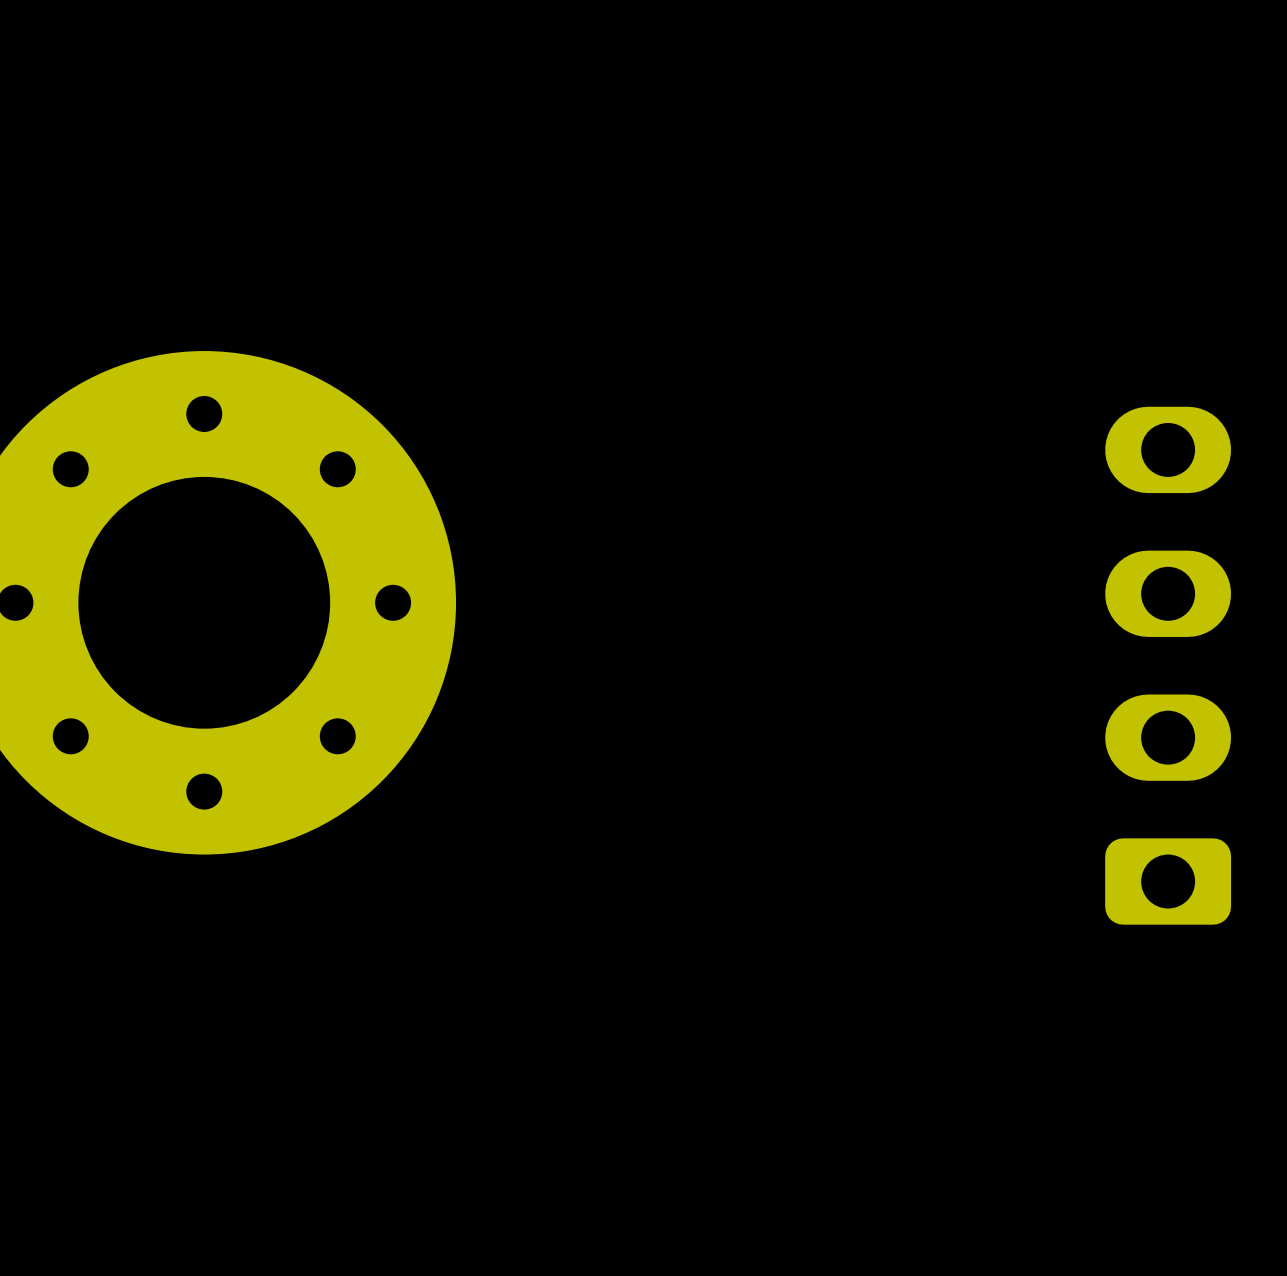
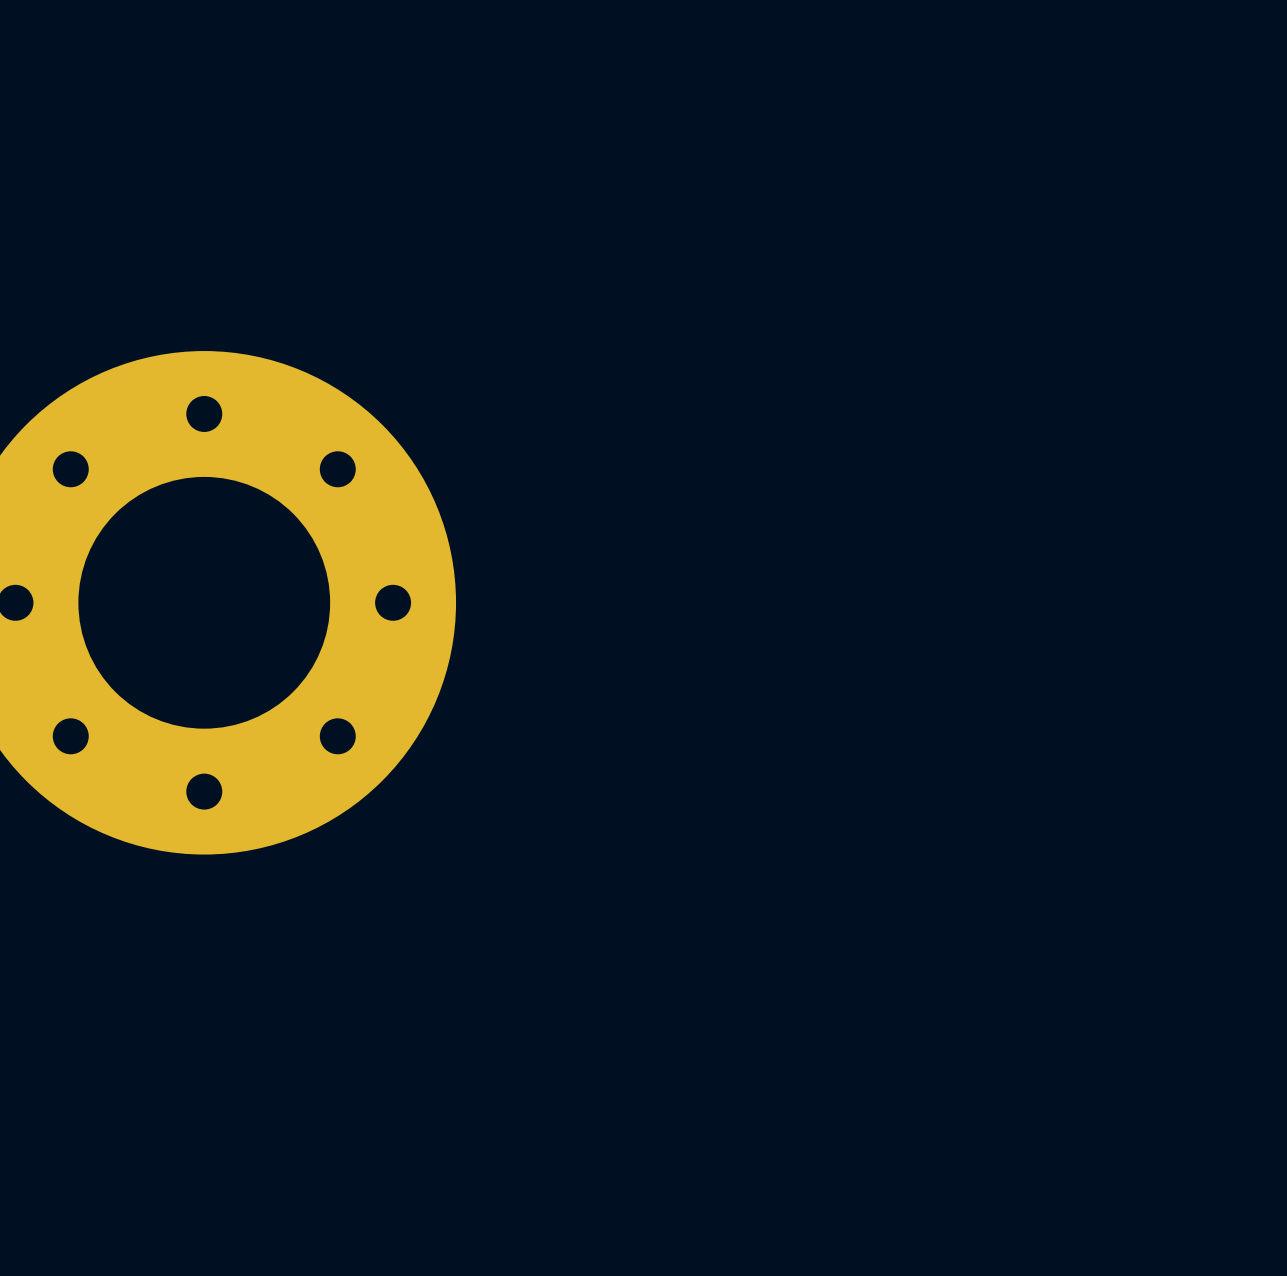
part: (1168, 665) -> none

